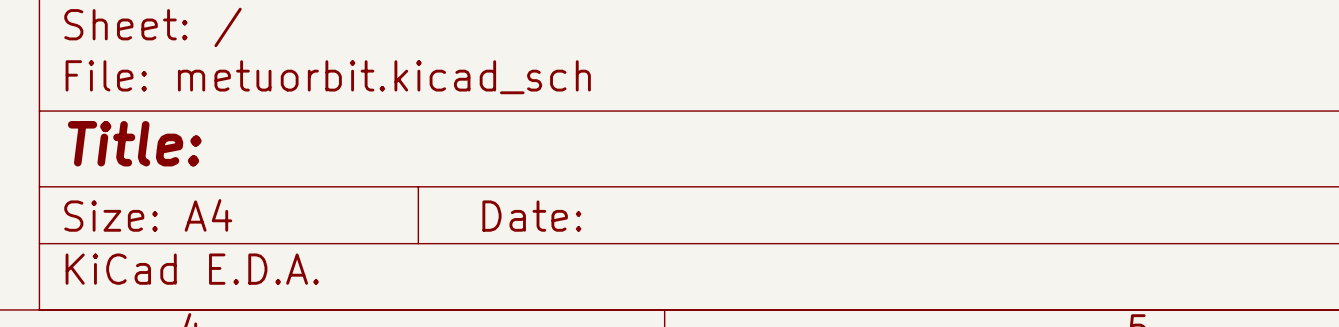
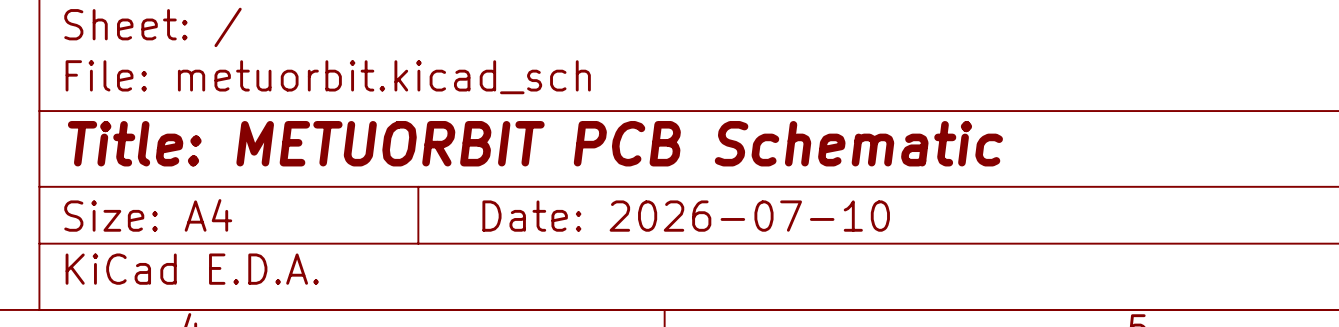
title block: Title: (134, 143) -> Title: METUORBIT PCB Schematic (535, 143)
title block: Date: (531, 216) -> Date: 2026-07-10 (686, 216)

